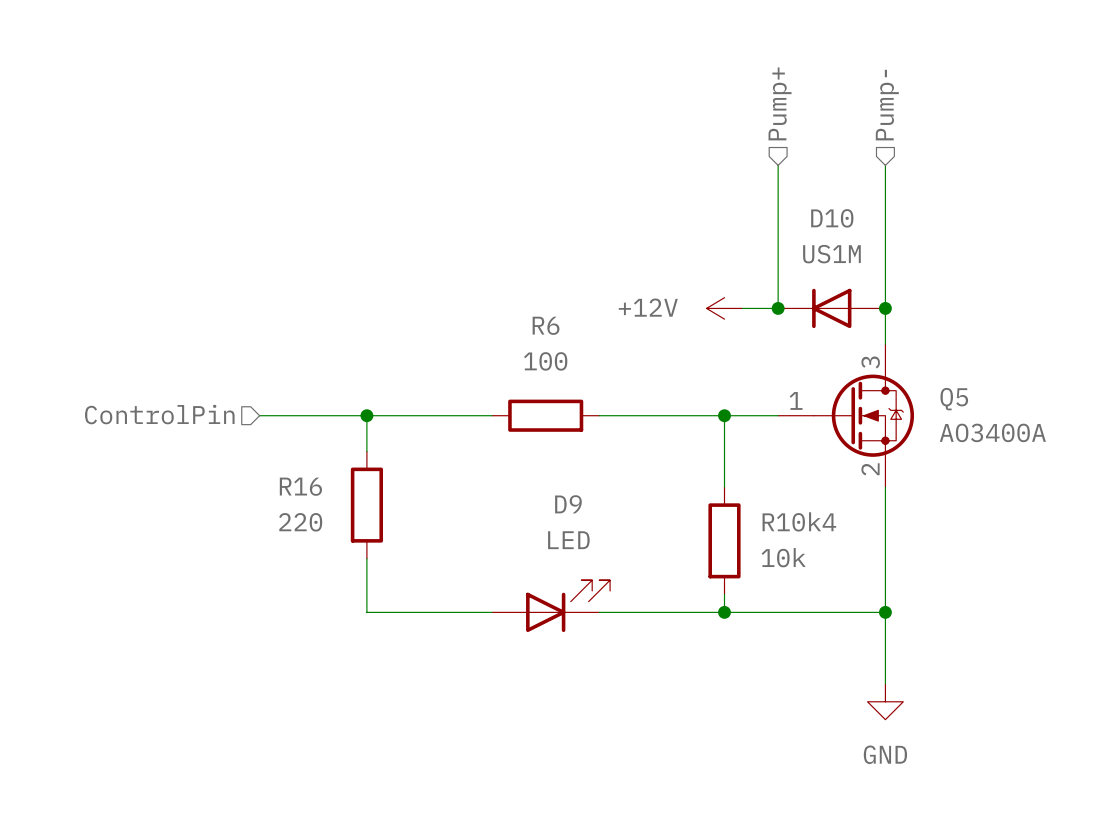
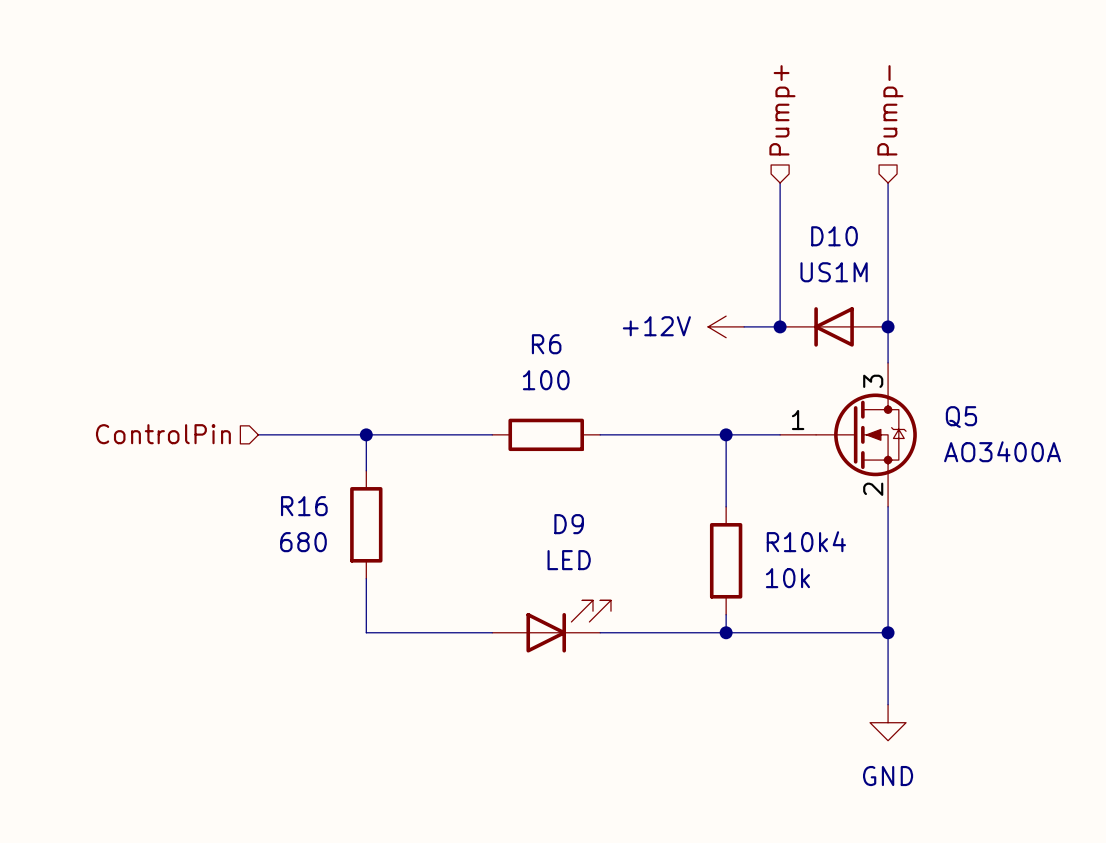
R16 value: 220 (300, 522) -> 680 (303, 542)

